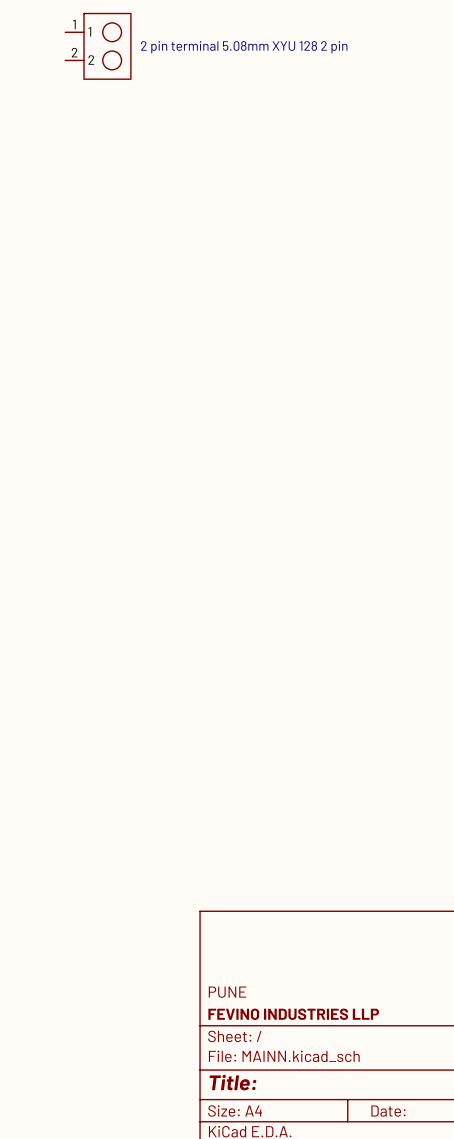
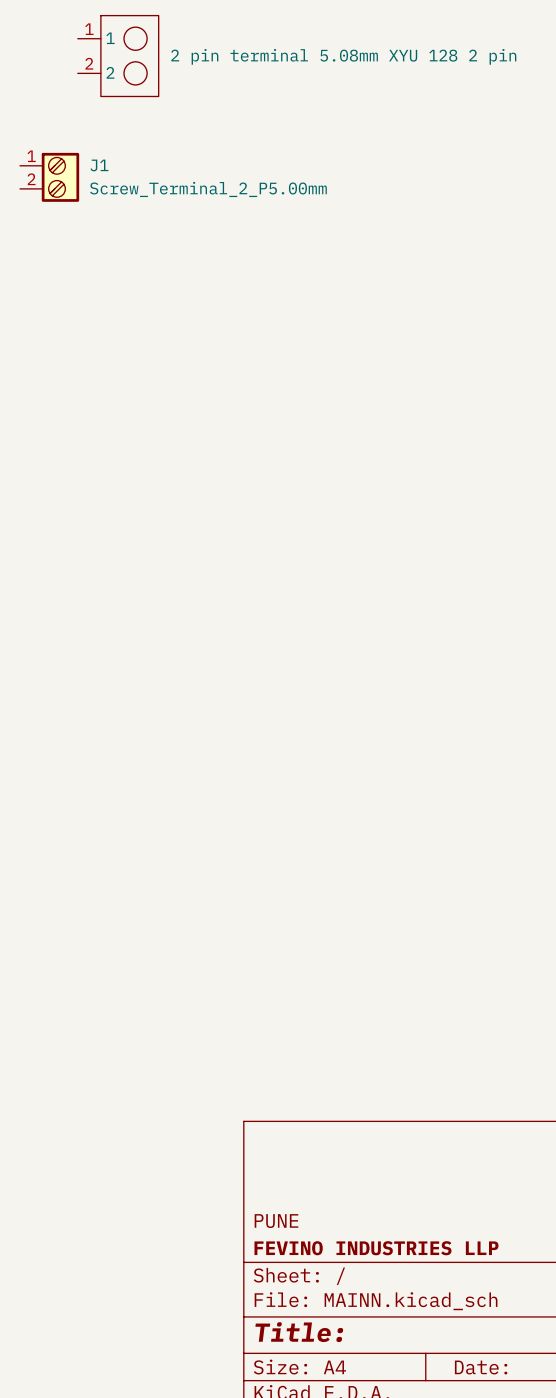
J1: none -> Screw_Terminal_2_P5.00mm (49, 177)

